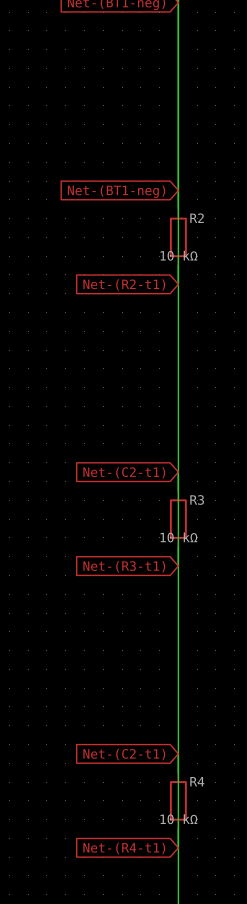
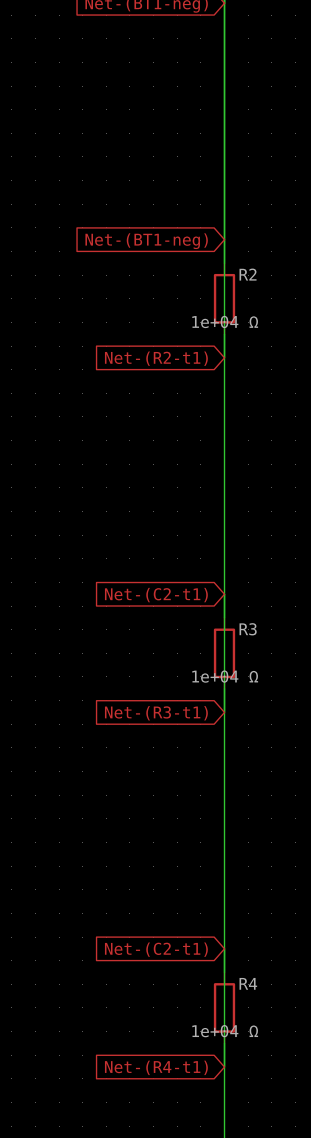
R2 value: 10 kΩ (178, 255) -> 1e+04 Ω (225, 321)
R3 value: 10 kΩ (178, 537) -> 1e+04 Ω (225, 676)
R4 value: 10 kΩ (178, 819) -> 1e+04 Ω (225, 1031)

